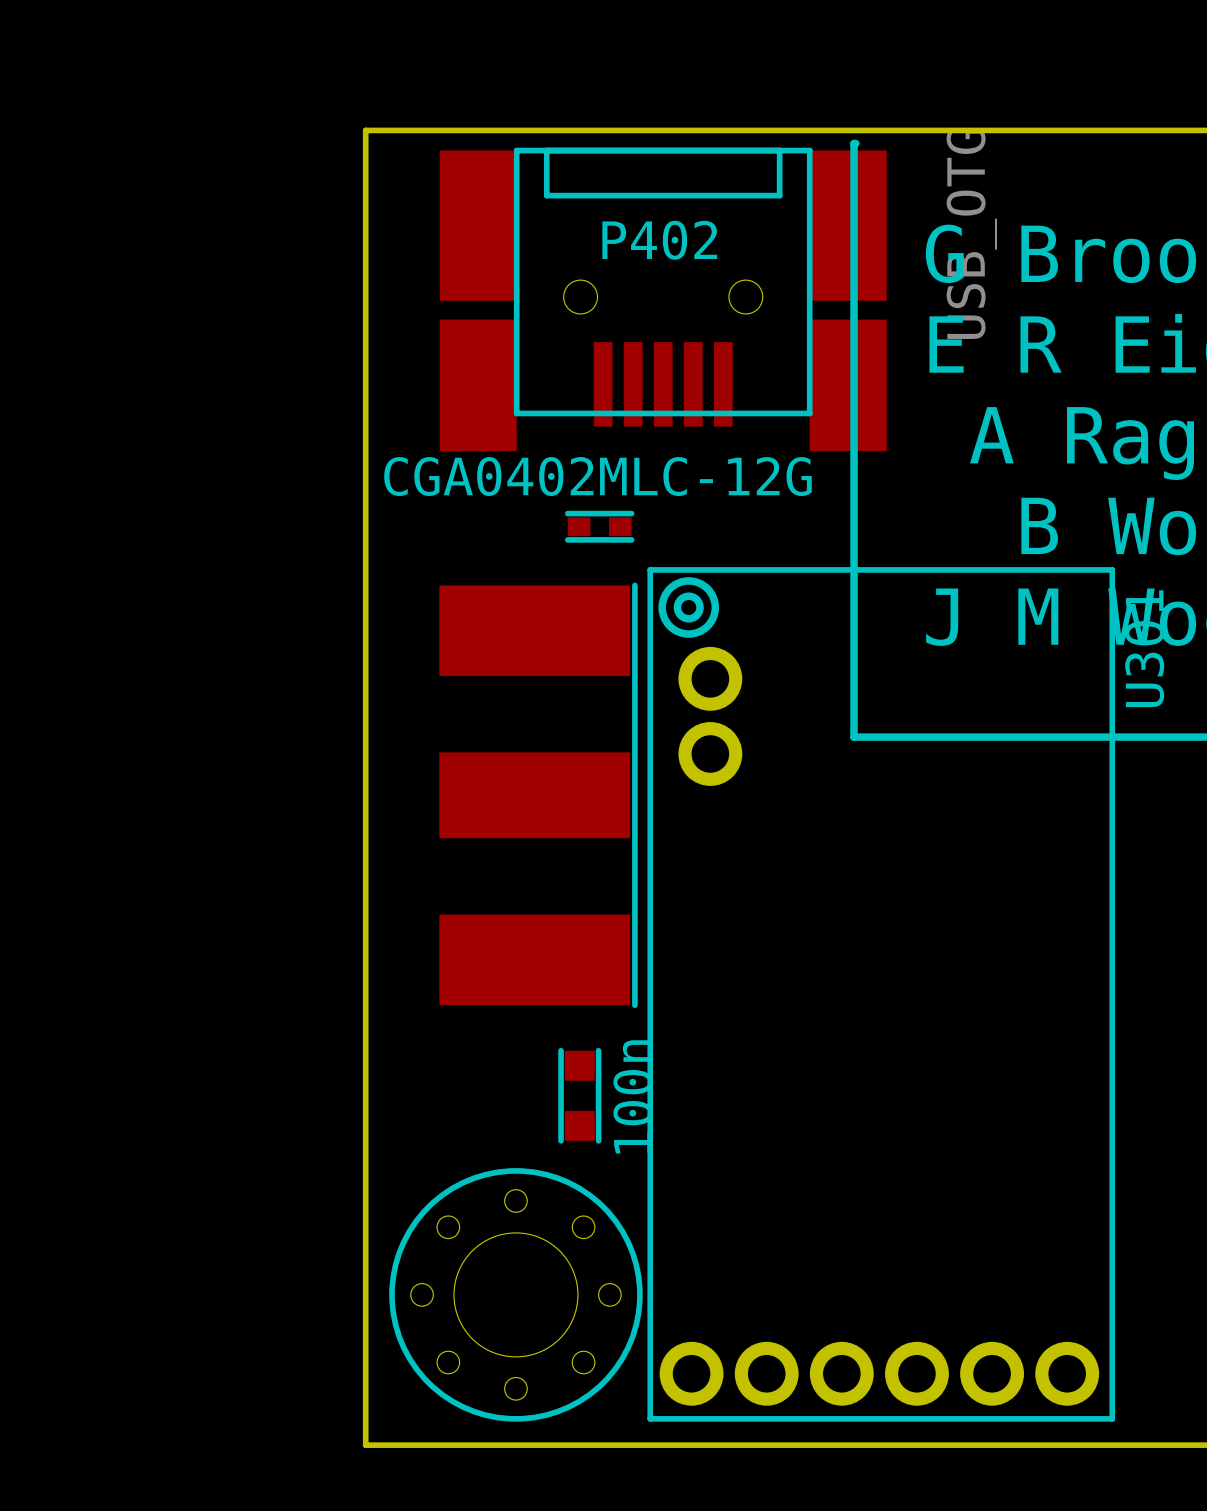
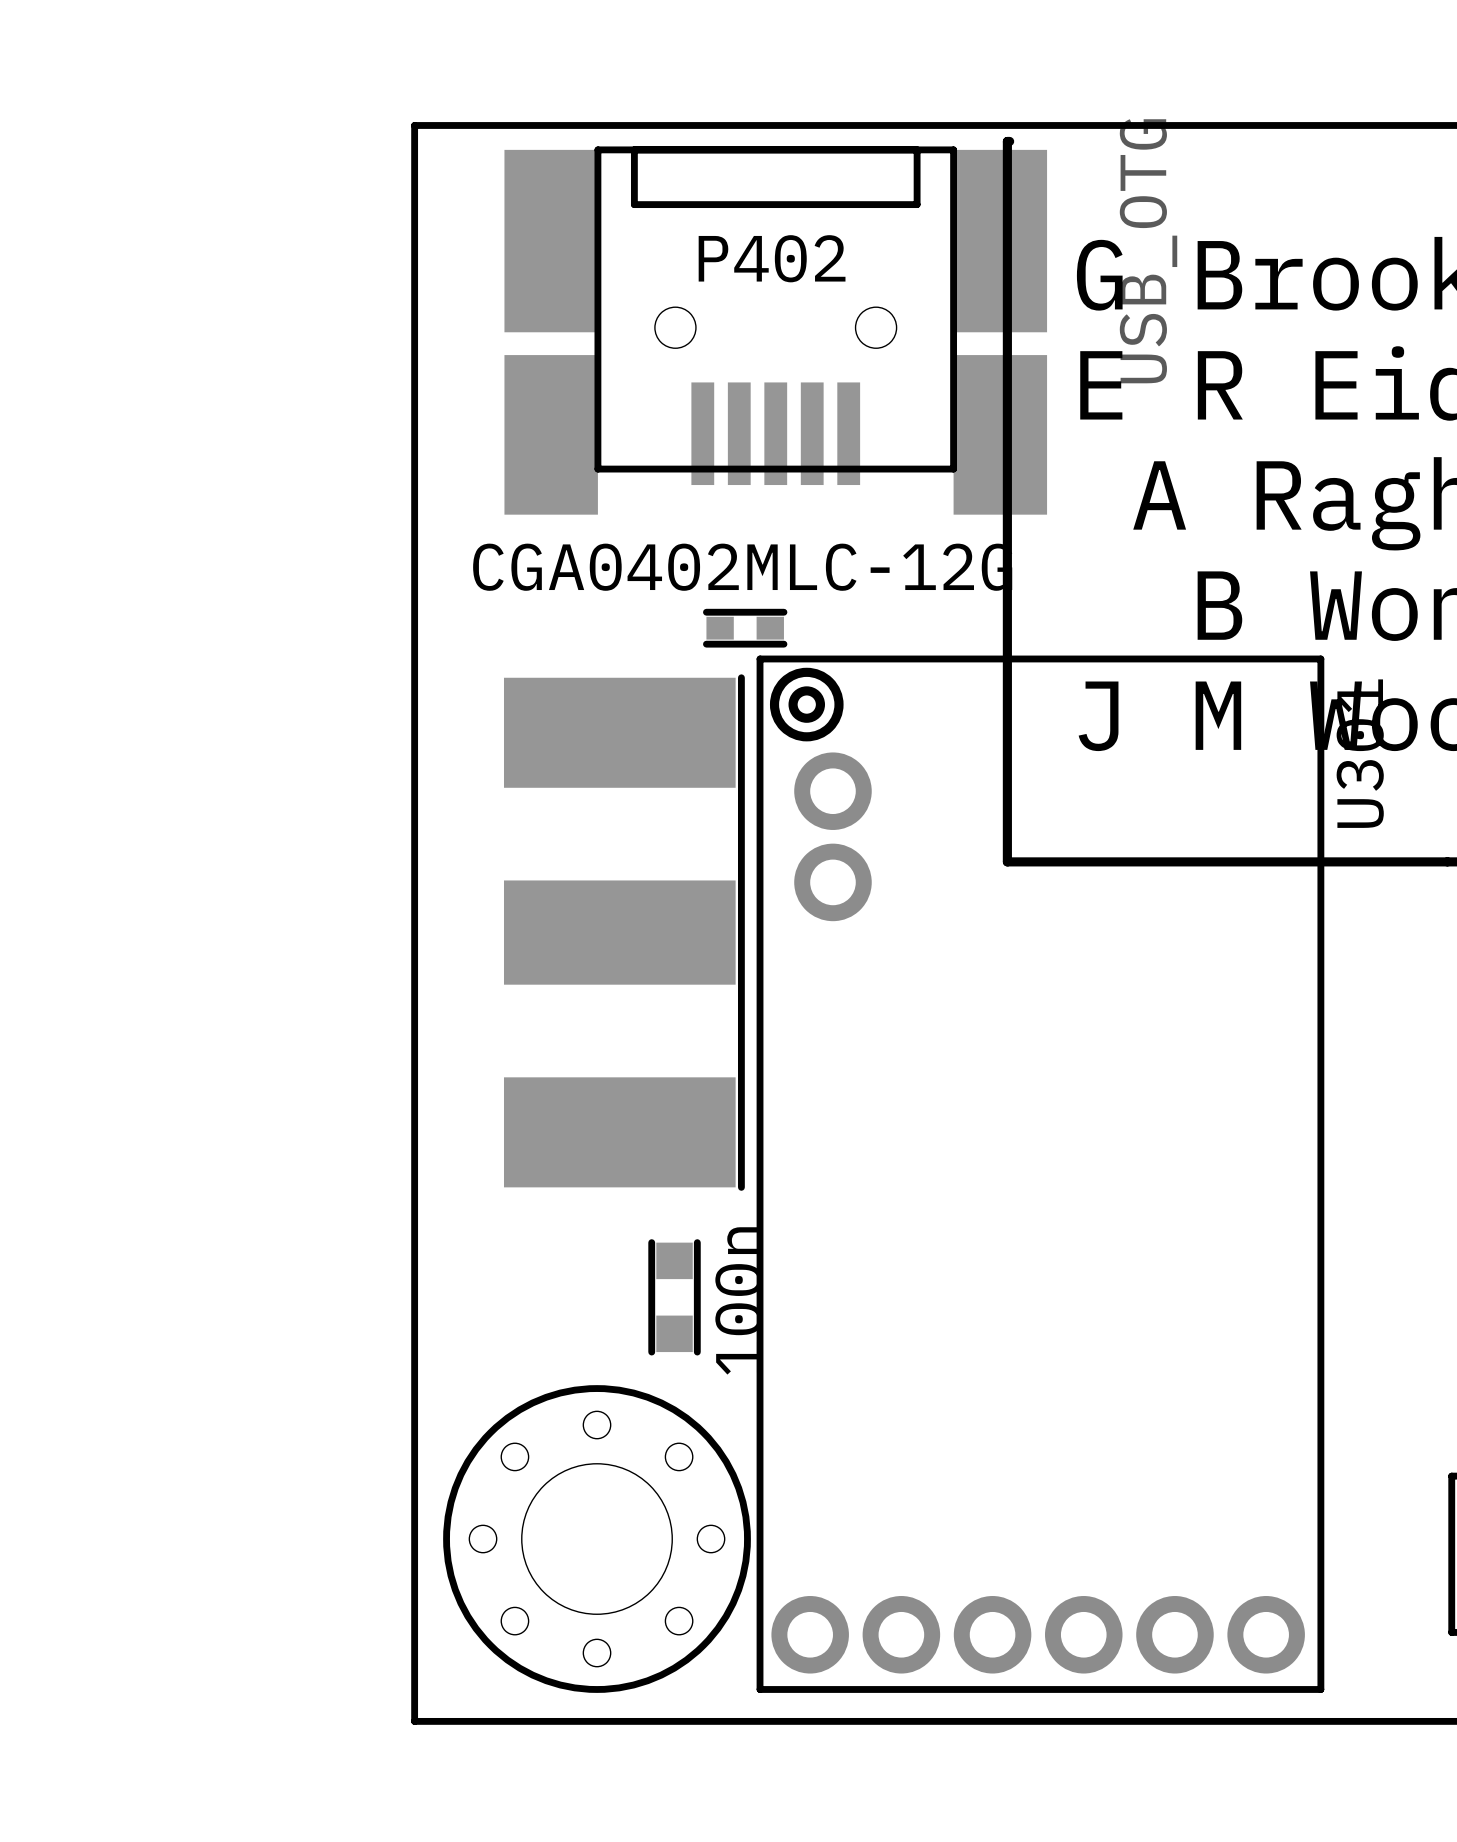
part position: (599, 526) -> (745, 628)

